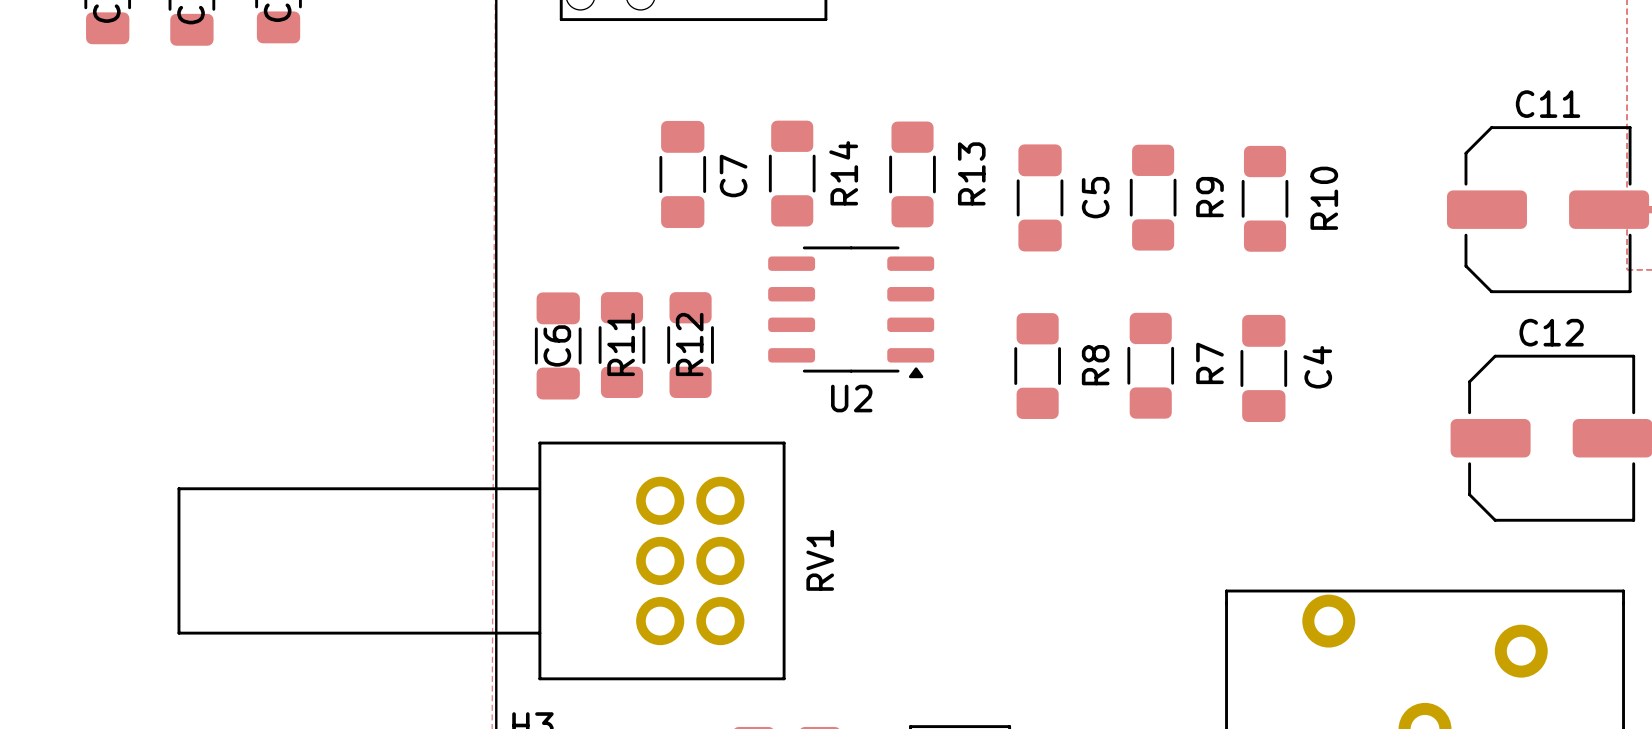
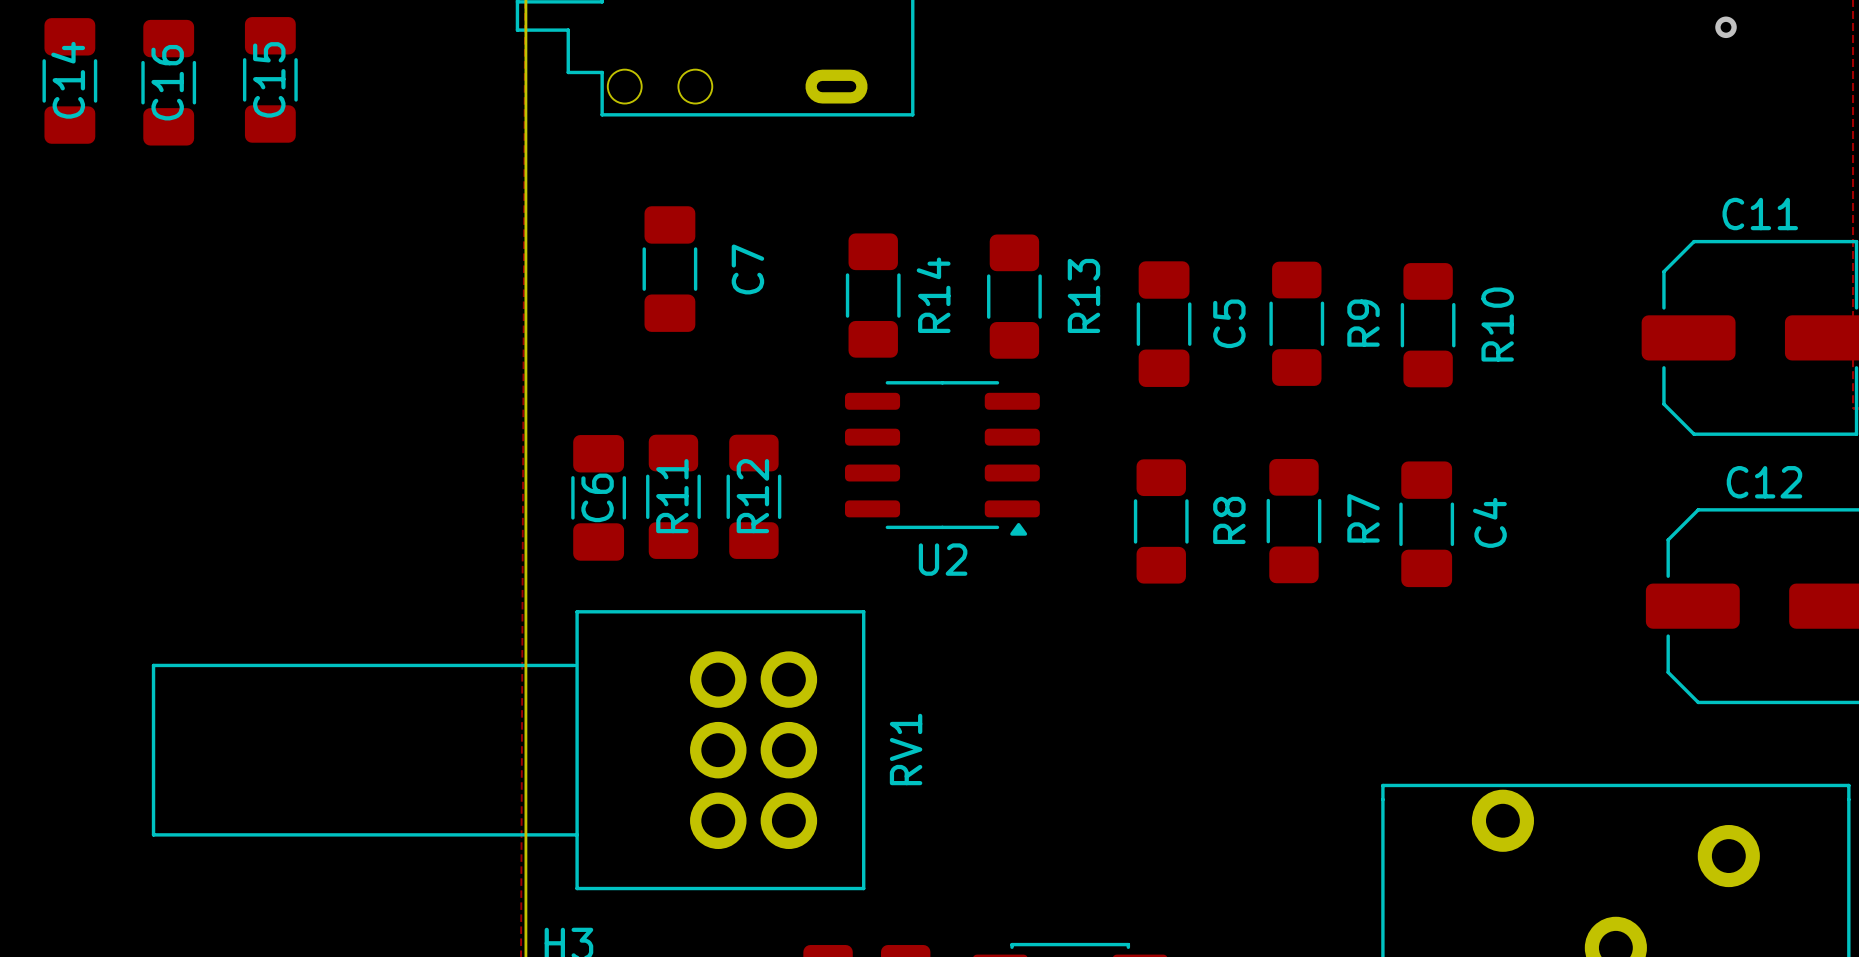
C7 position: (682, 174) -> (669, 269)
C7 name position: C7 (733, 175) -> C7 (747, 269)

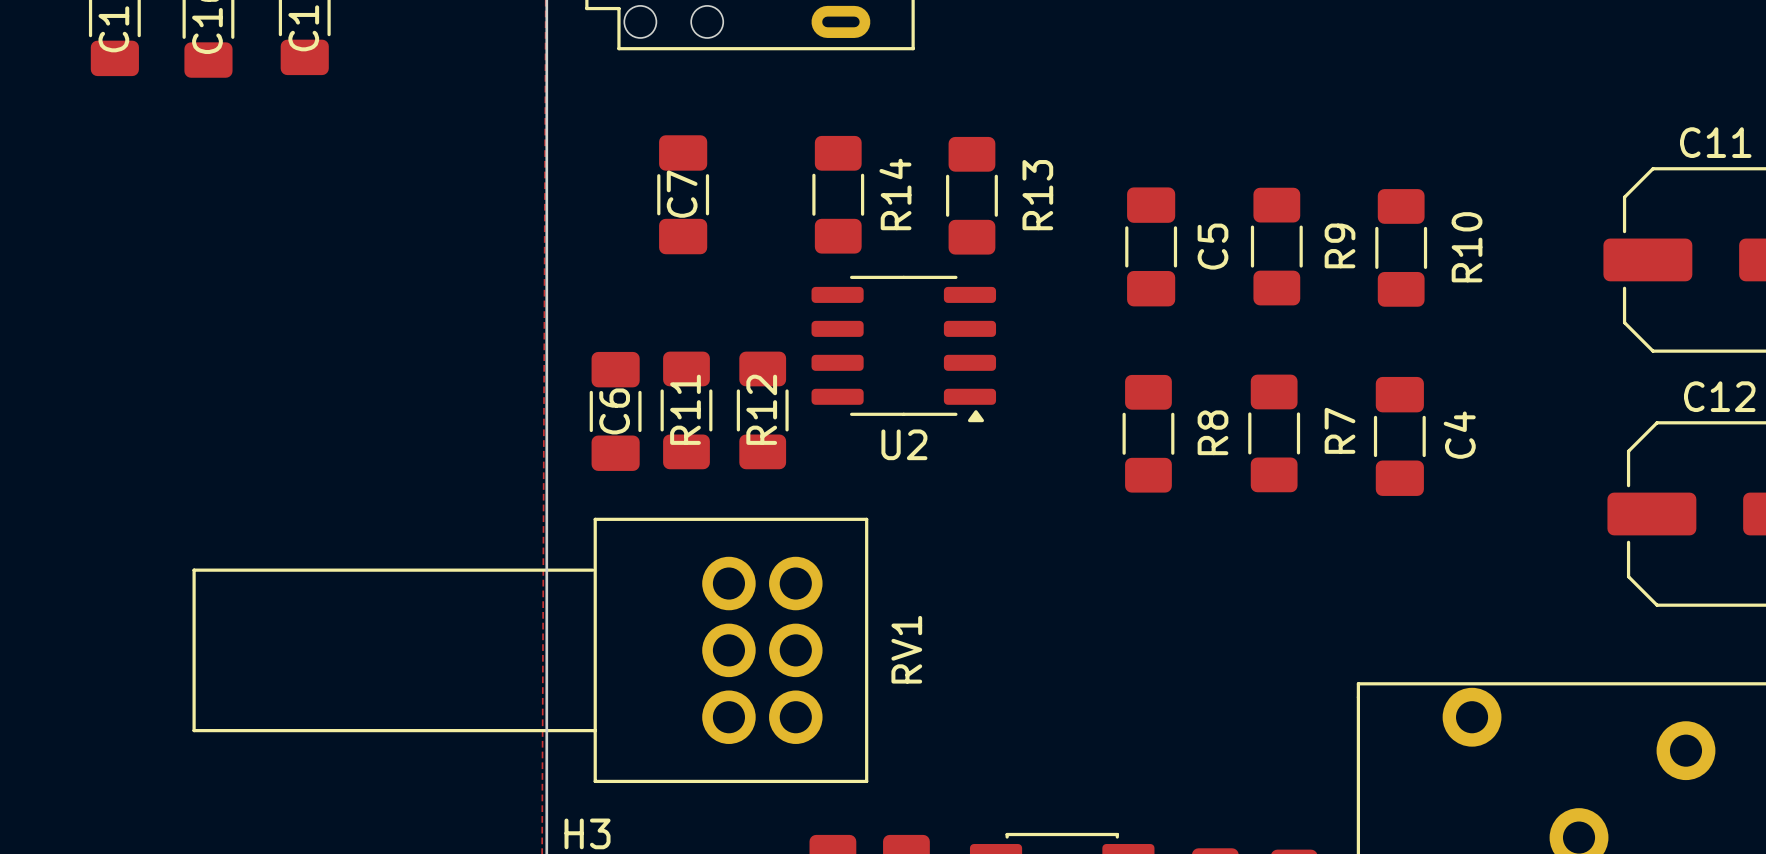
C7 name position: C7 (747, 269) -> C7 (682, 194)
R14 position: (873, 295) -> (838, 194)
R13 position: (1014, 296) -> (971, 195)
U2 position: (942, 458) -> (903, 348)

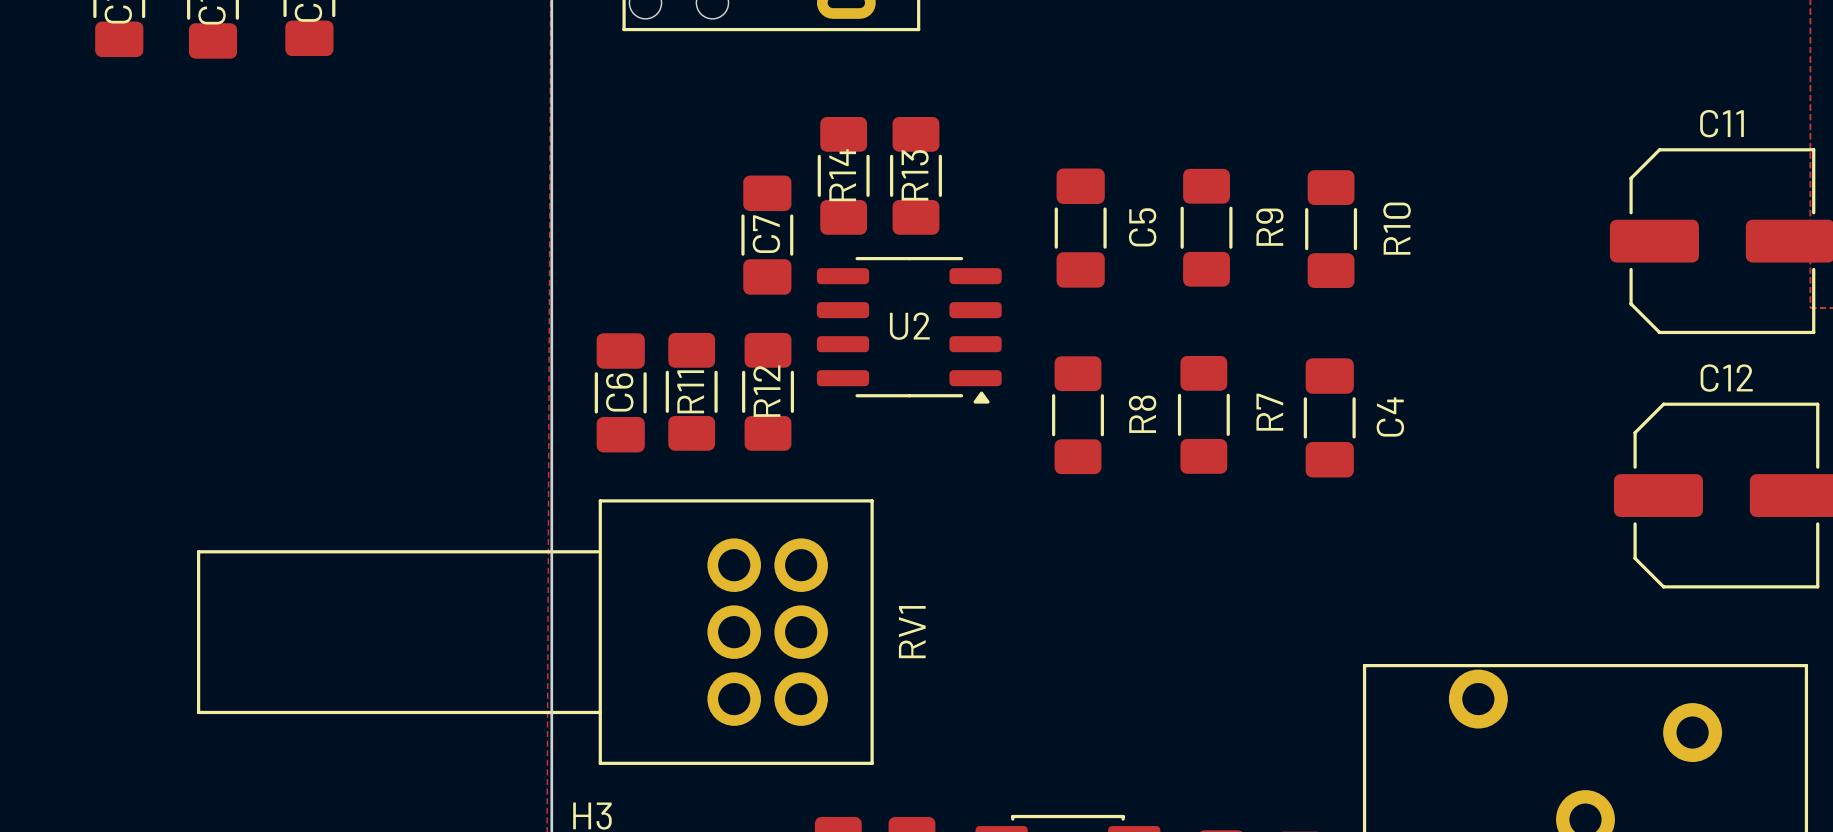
C7 position: (683, 194) -> (767, 235)
R14 name position: R14 (895, 194) -> R14 (842, 175)
R13 position: (971, 195) -> (915, 175)
R13 name position: R13 (1037, 195) -> R13 (915, 175)
C5 position: (1151, 246) -> (1080, 228)
R9 position: (1276, 246) -> (1206, 227)
R10 position: (1401, 247) -> (1331, 229)
R8 position: (1148, 433) -> (1078, 415)
R7 position: (1274, 433) -> (1203, 414)
C4 position: (1399, 436) -> (1329, 417)
U2 name position: U2 (904, 444) -> U2 (909, 326)

